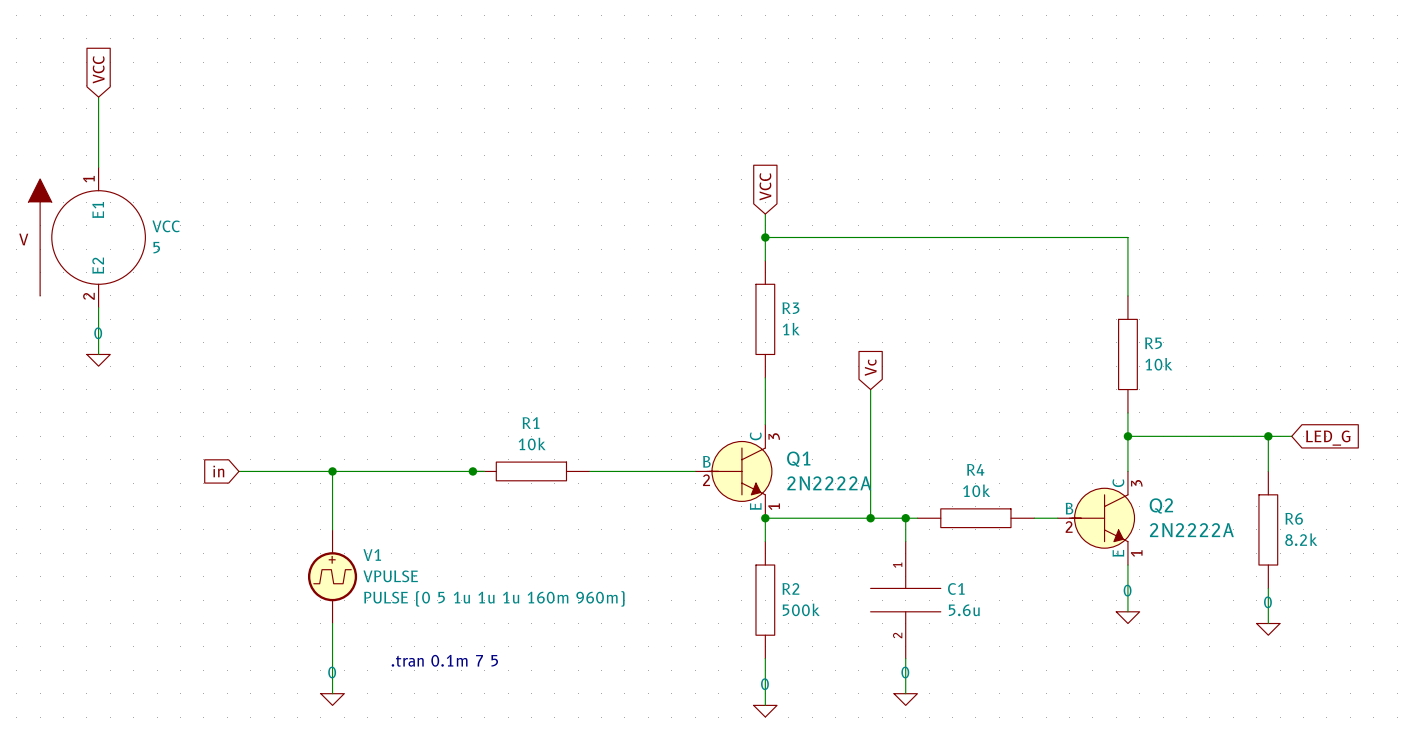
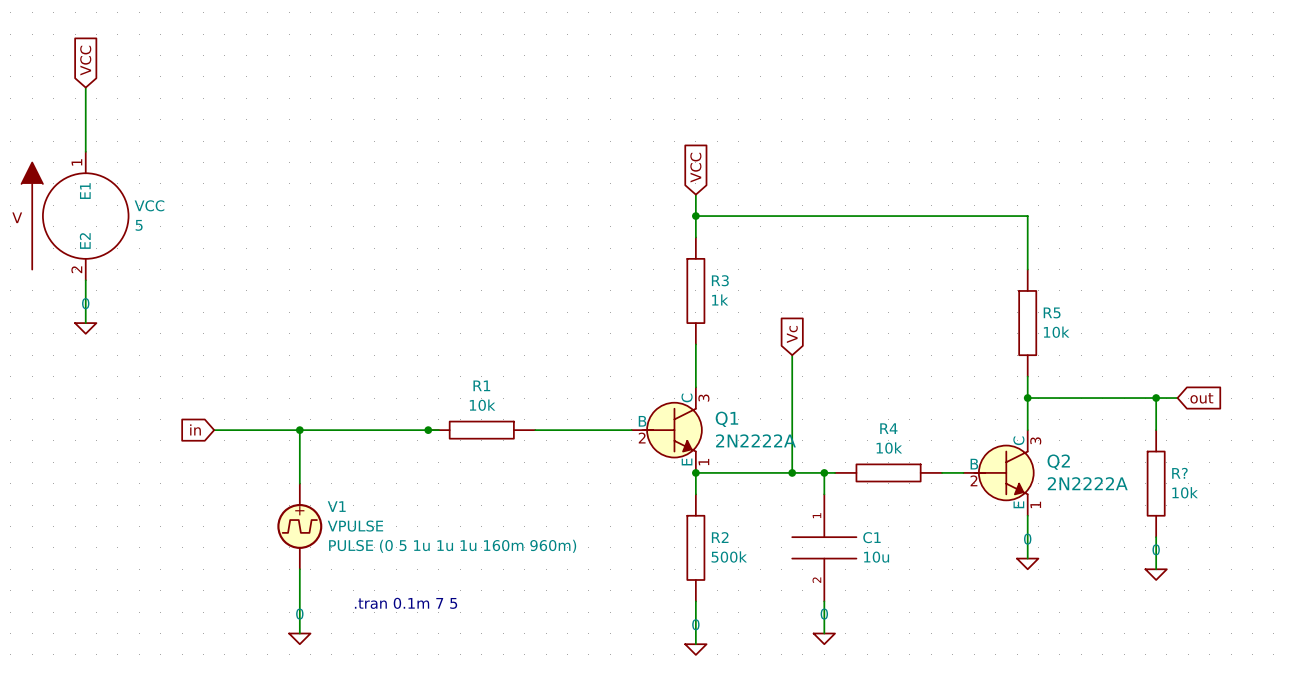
global label: LED_G (1328, 438) -> out (1201, 398)
R6 name: R6 (1294, 518) -> R? (1179, 473)
R6 value: 8.2k (1301, 539) -> 10k (1185, 492)
C1 value: 5.6u (964, 610) -> 10u (876, 557)

